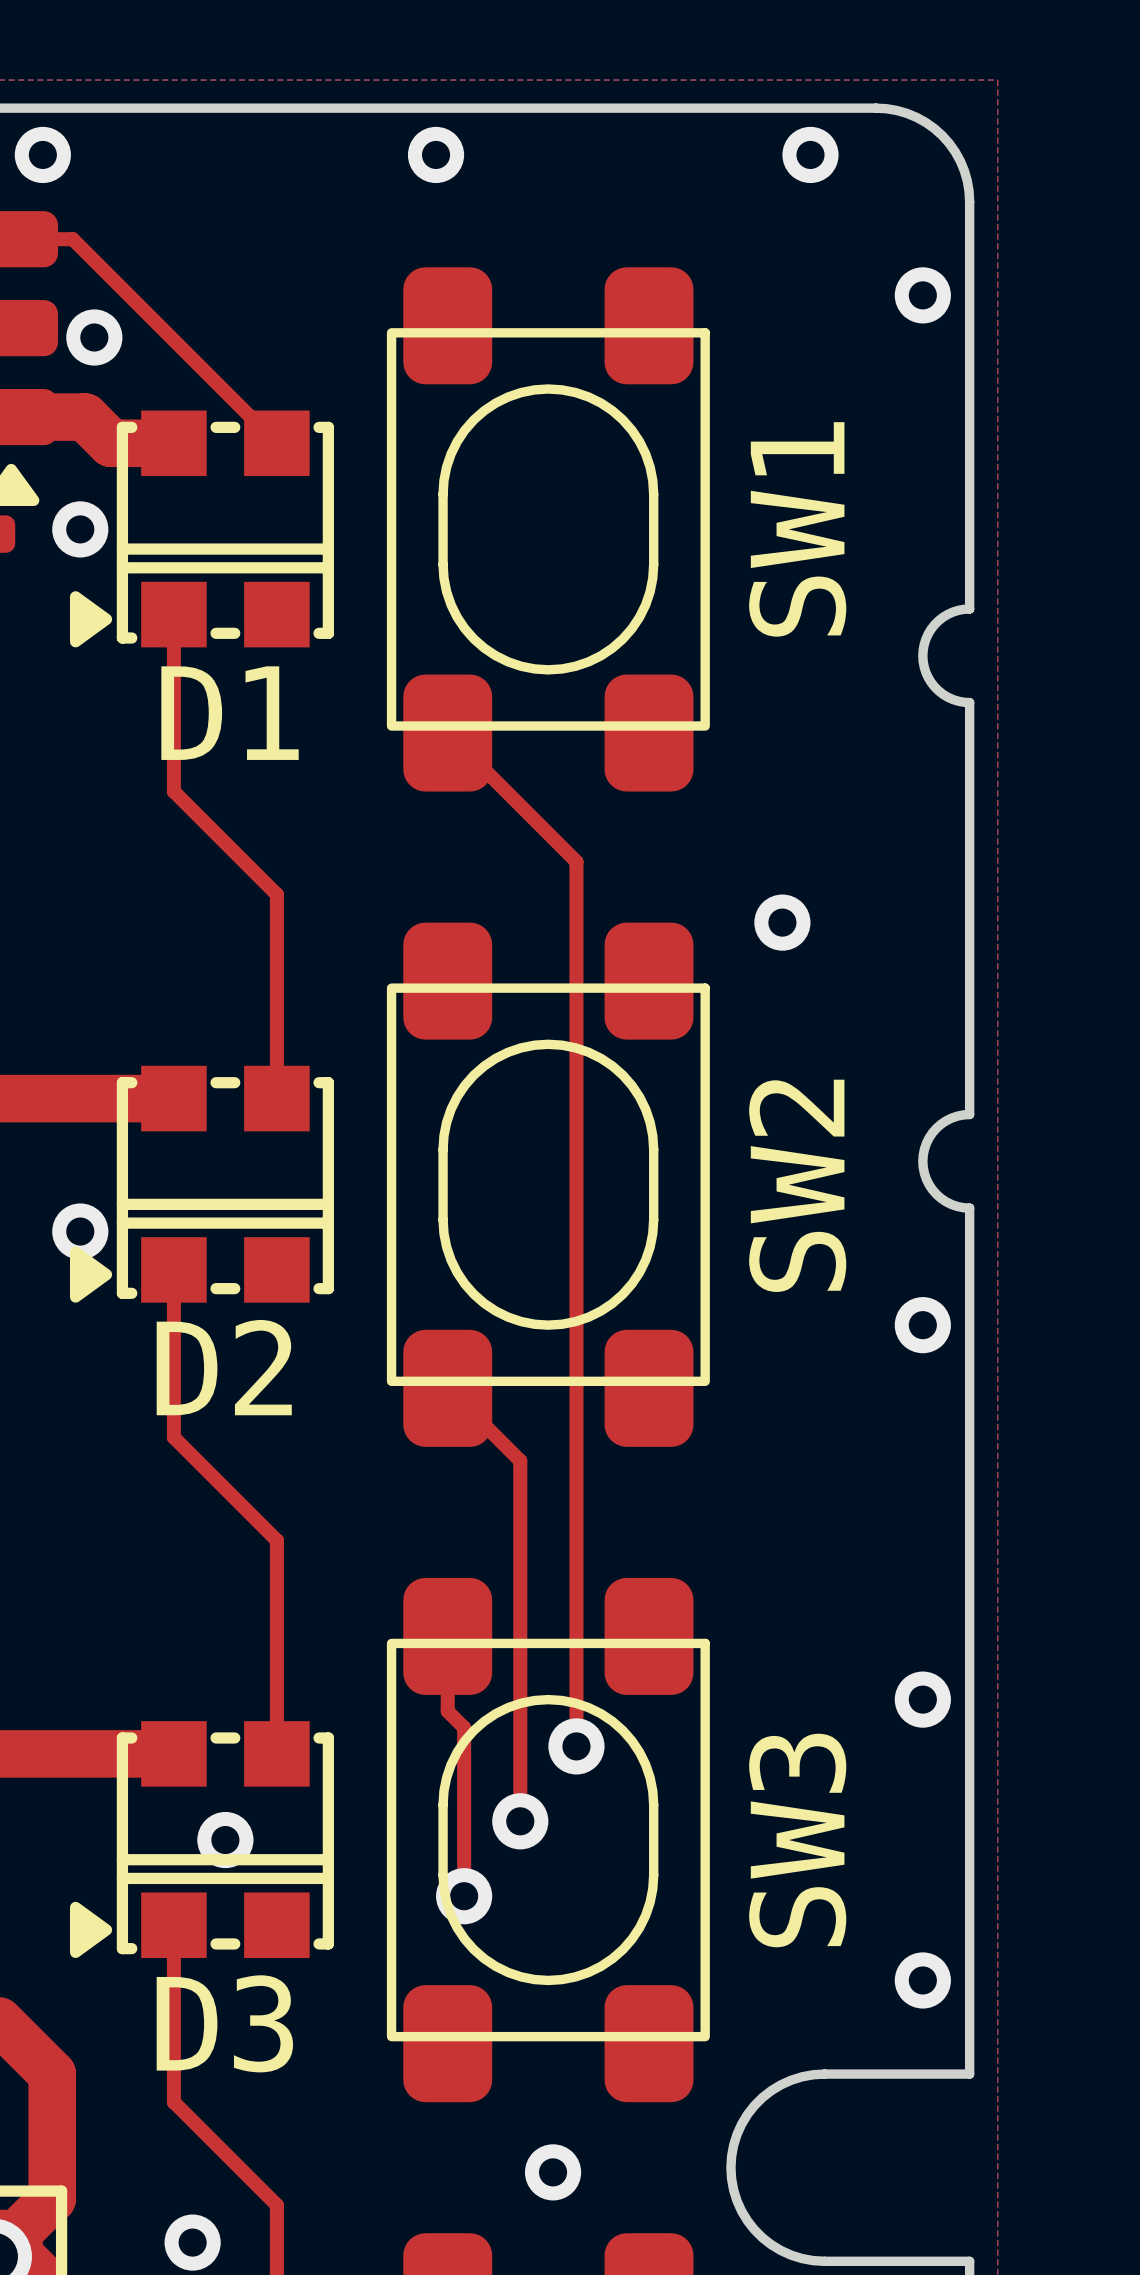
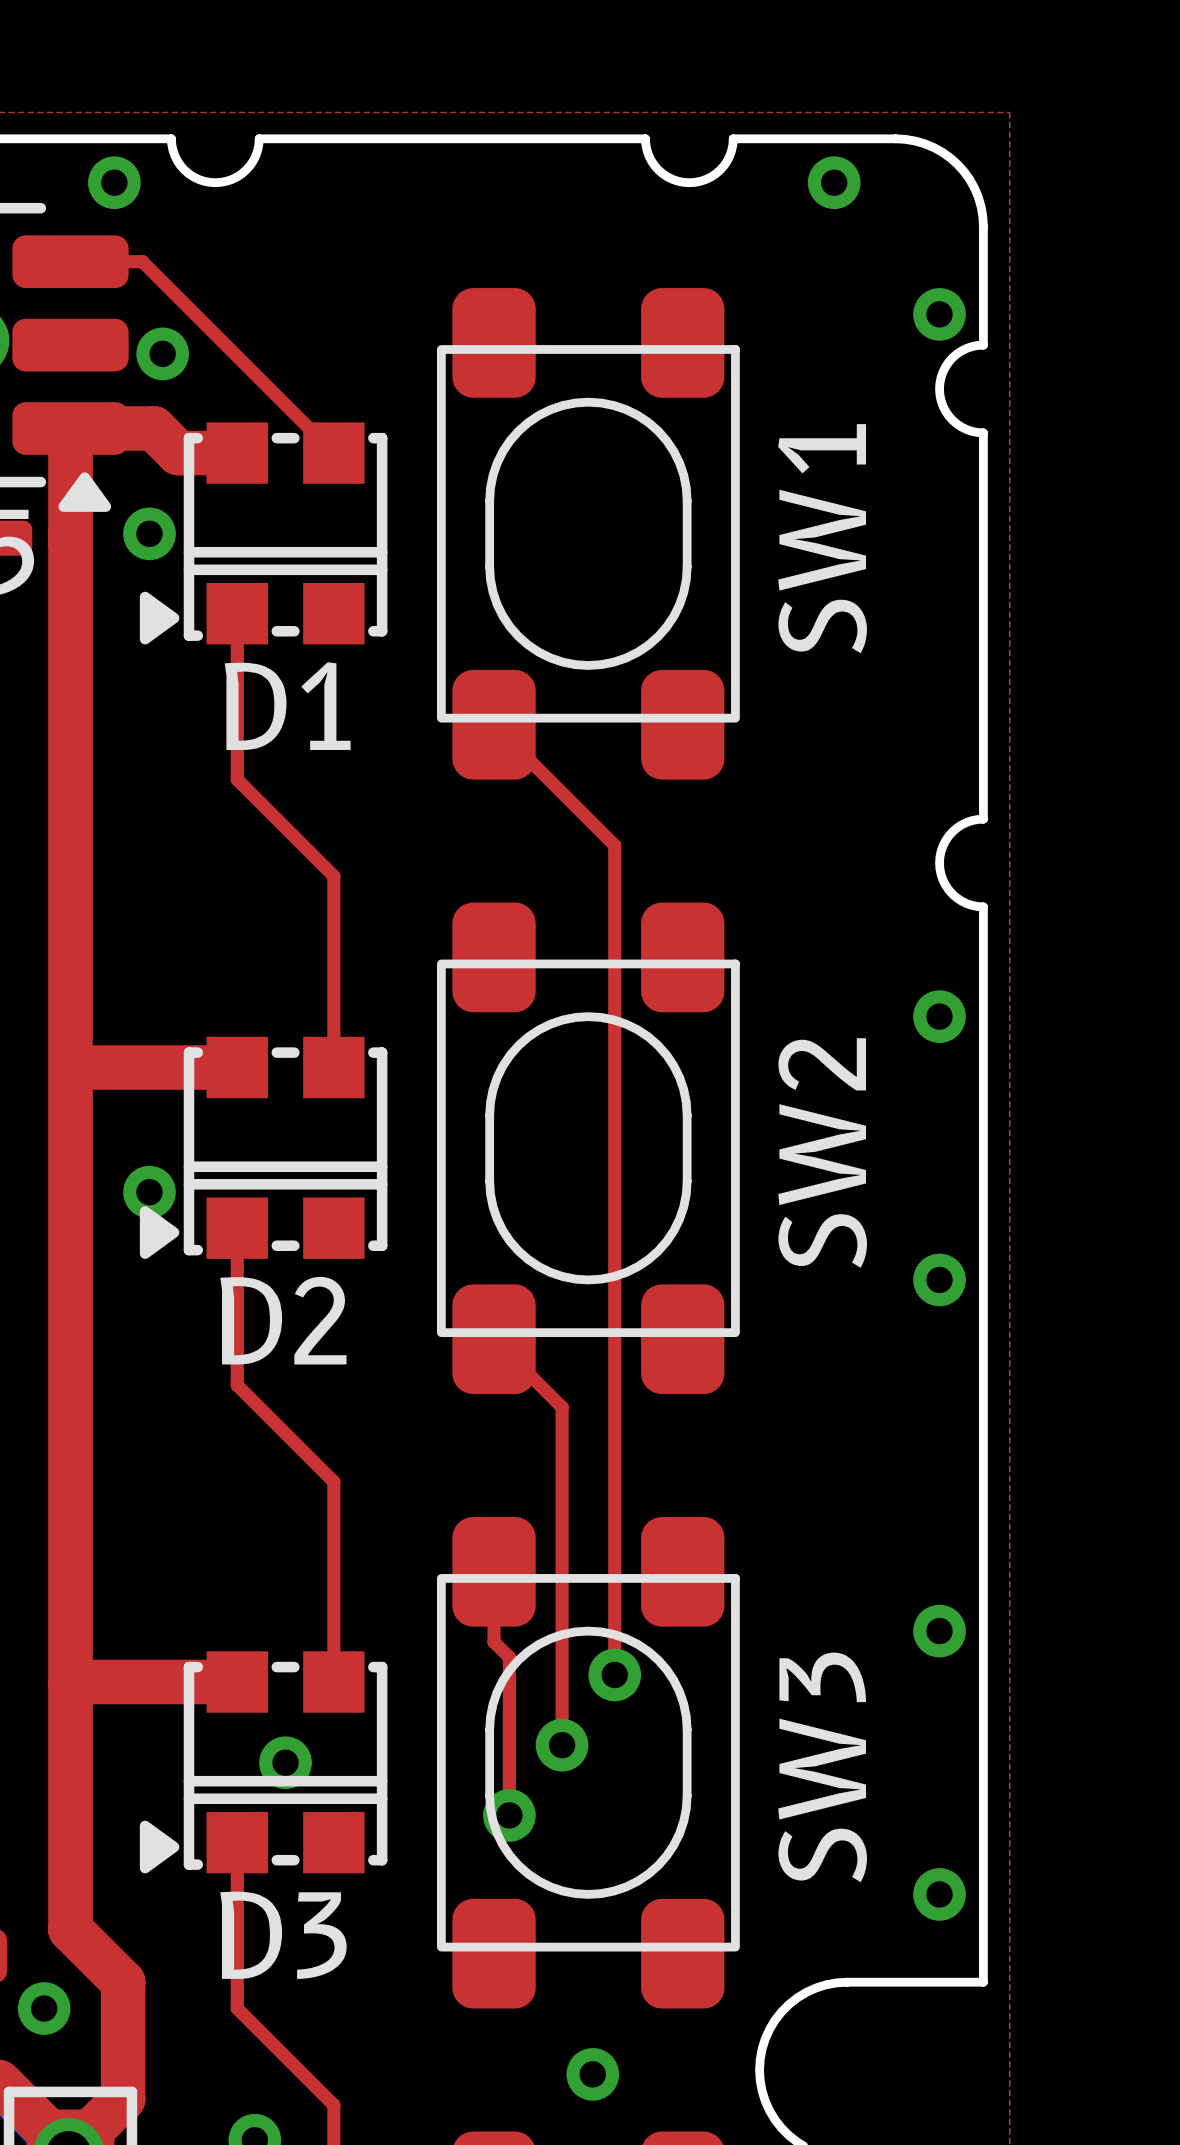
board edge: (103, 108) (197, 108) -> (171, 138) (174, 155) (184, 169) (198, 179) (215, 182) (232, 179) (246, 169) (255, 155) (259, 138)
board edge: (609, 108) (702, 108) -> (645, 138) (648, 155) (658, 169) (672, 179) (689, 182) (706, 179) (720, 169) (729, 155) (733, 138)
via: (436, 154) -> none
board edge: (969, 328) (969, 421) -> (983, 345) (966, 348) (952, 357) (942, 372) (939, 388) (942, 405) (952, 420) (966, 429) (983, 432)
board edge: (969, 608) (947, 614) (934, 624) (925, 639) (922, 655) (925, 672) (934, 686) (953, 699) (969, 702) -> (983, 608) (983, 696)
board edge: (969, 833) (969, 927) -> (983, 819) (966, 822) (952, 831) (942, 846) (939, 863) (942, 879) (952, 894) (966, 903) (983, 906)
via position: (782, 922) -> (939, 1016)
board edge: (969, 1114) (951, 1118) (936, 1128) (926, 1143) (922, 1161) (926, 1179) (936, 1194) (951, 1204) (969, 1208) -> (983, 1082) (983, 1170)

